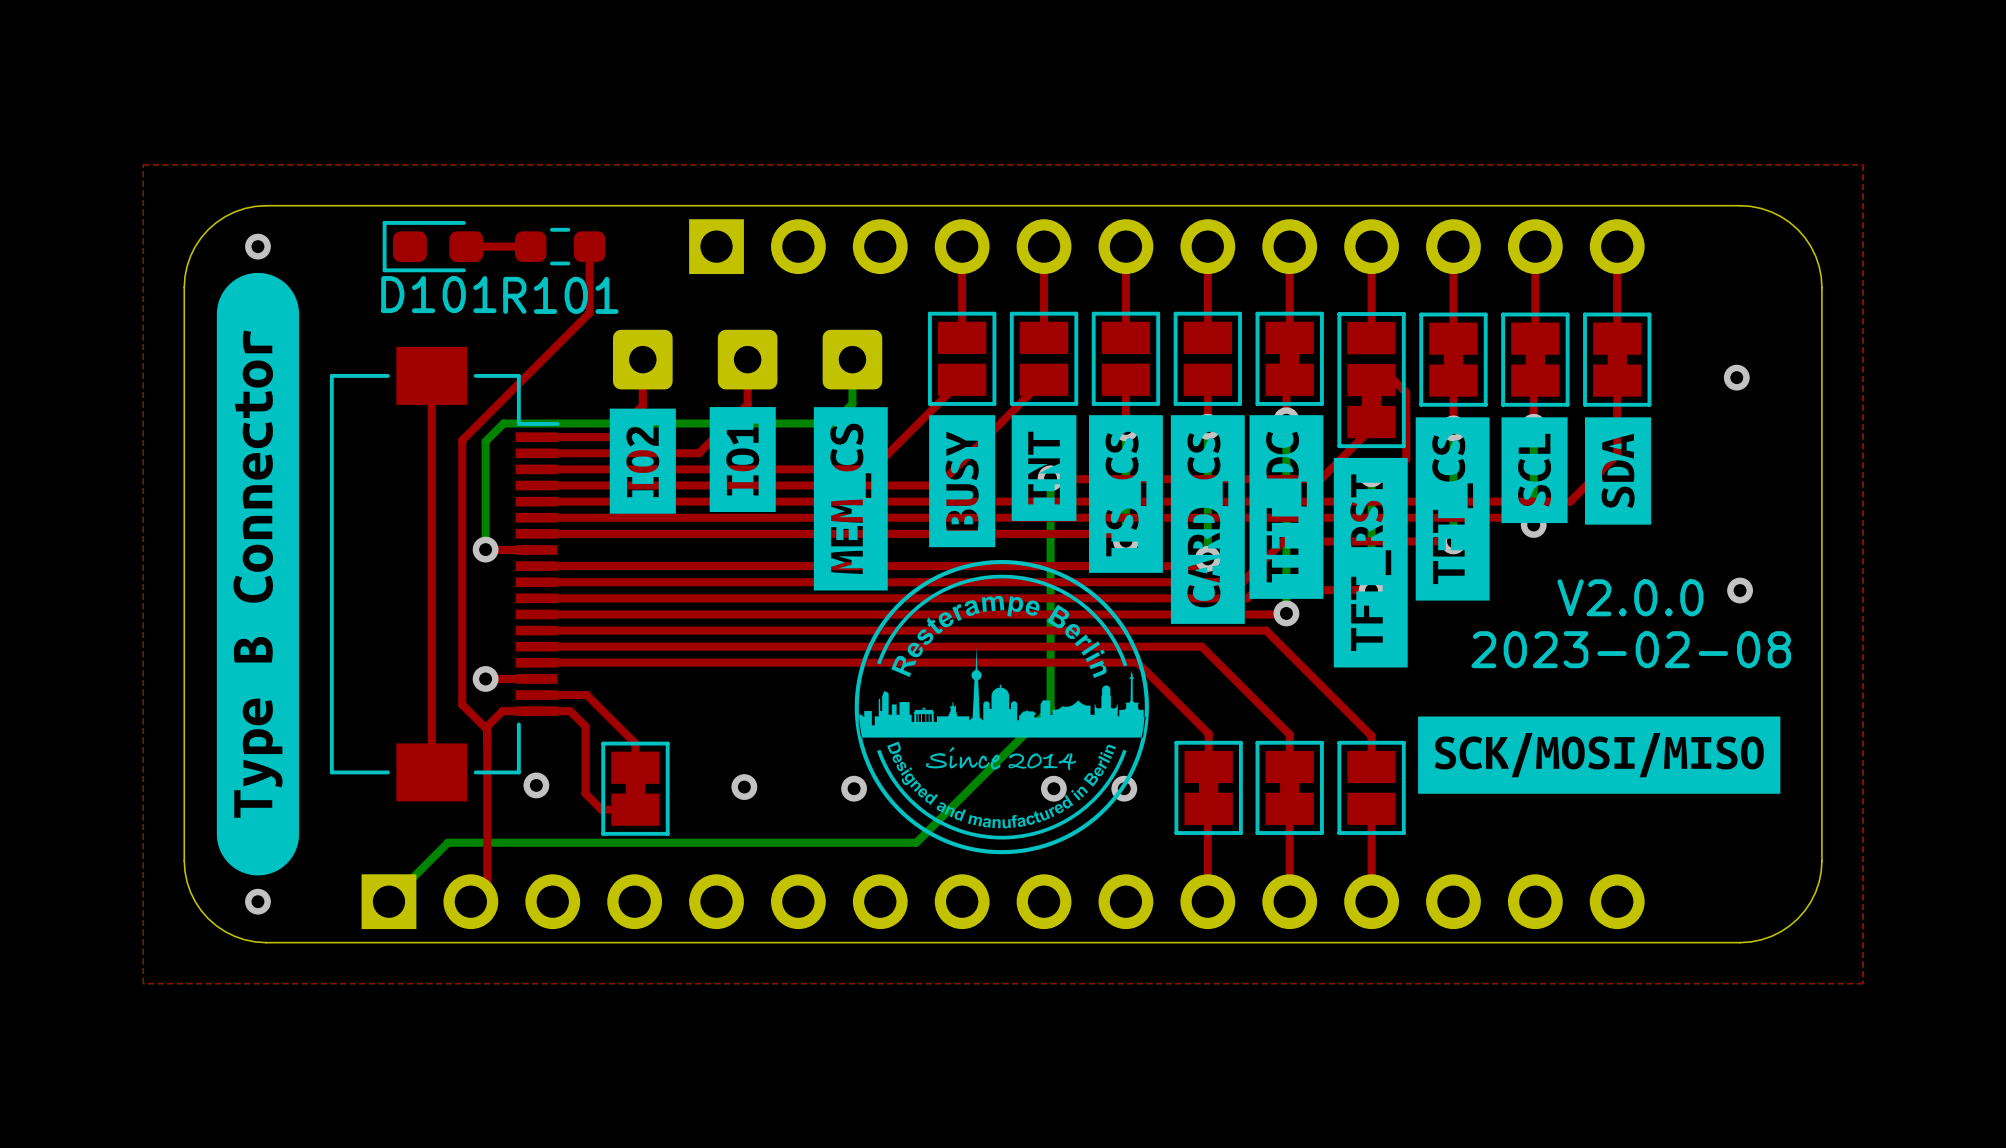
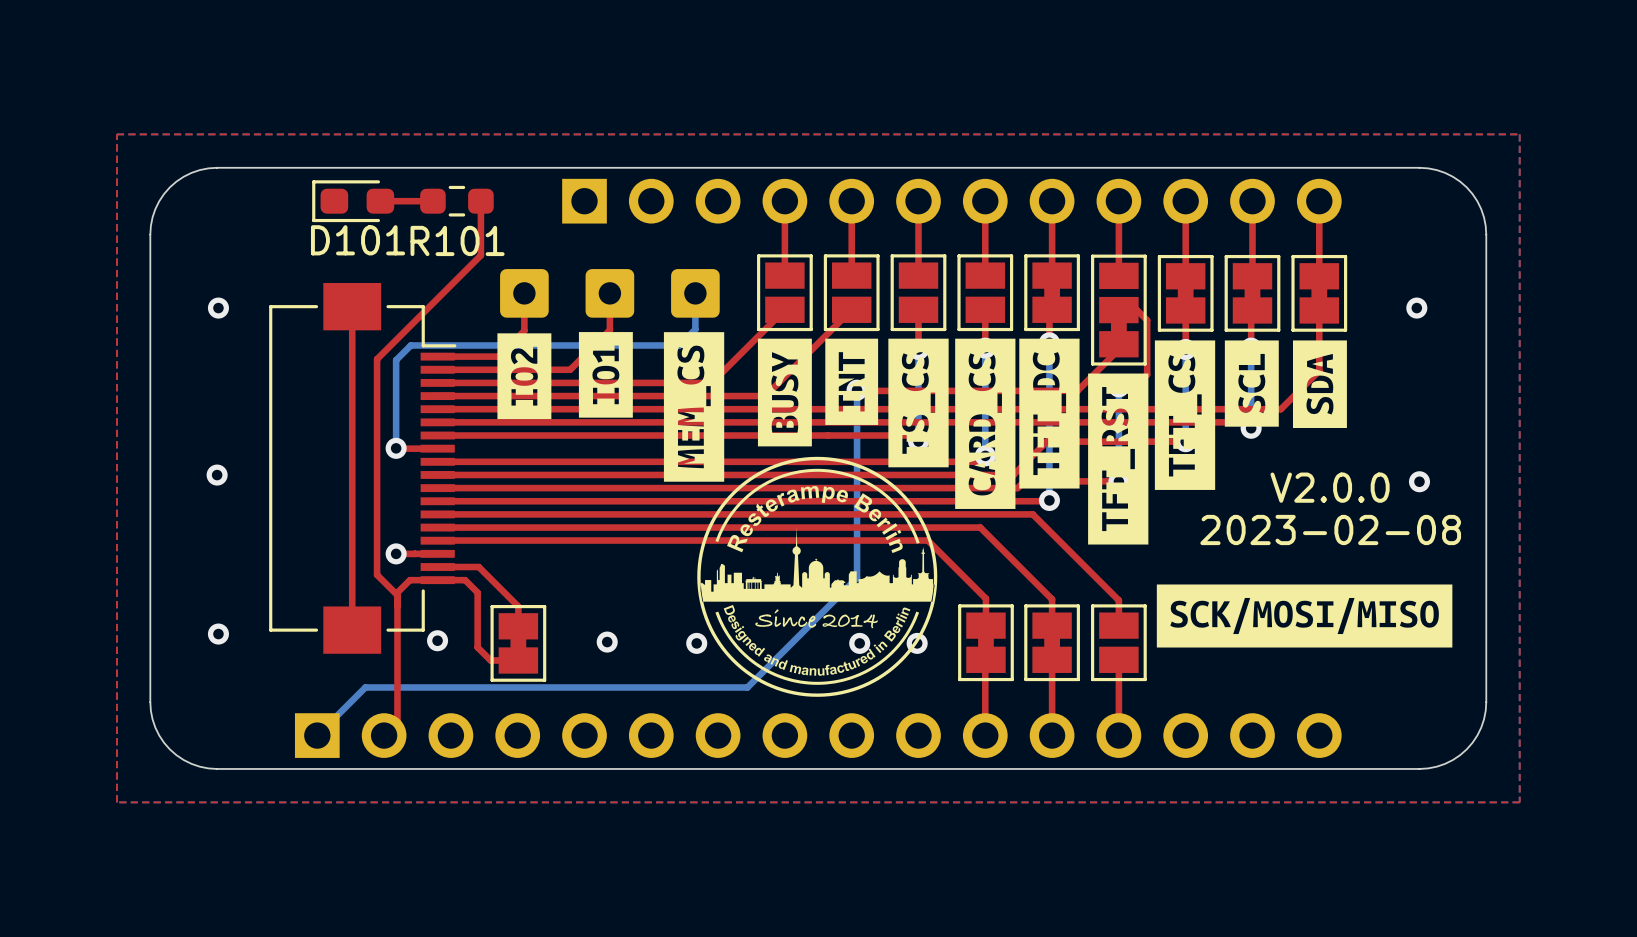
via position: (257, 246) -> (218, 308)
drawing: [216, 272, 300, 876] -> none
via: none -> (217, 475)
via position: (257, 901) -> (218, 634)

